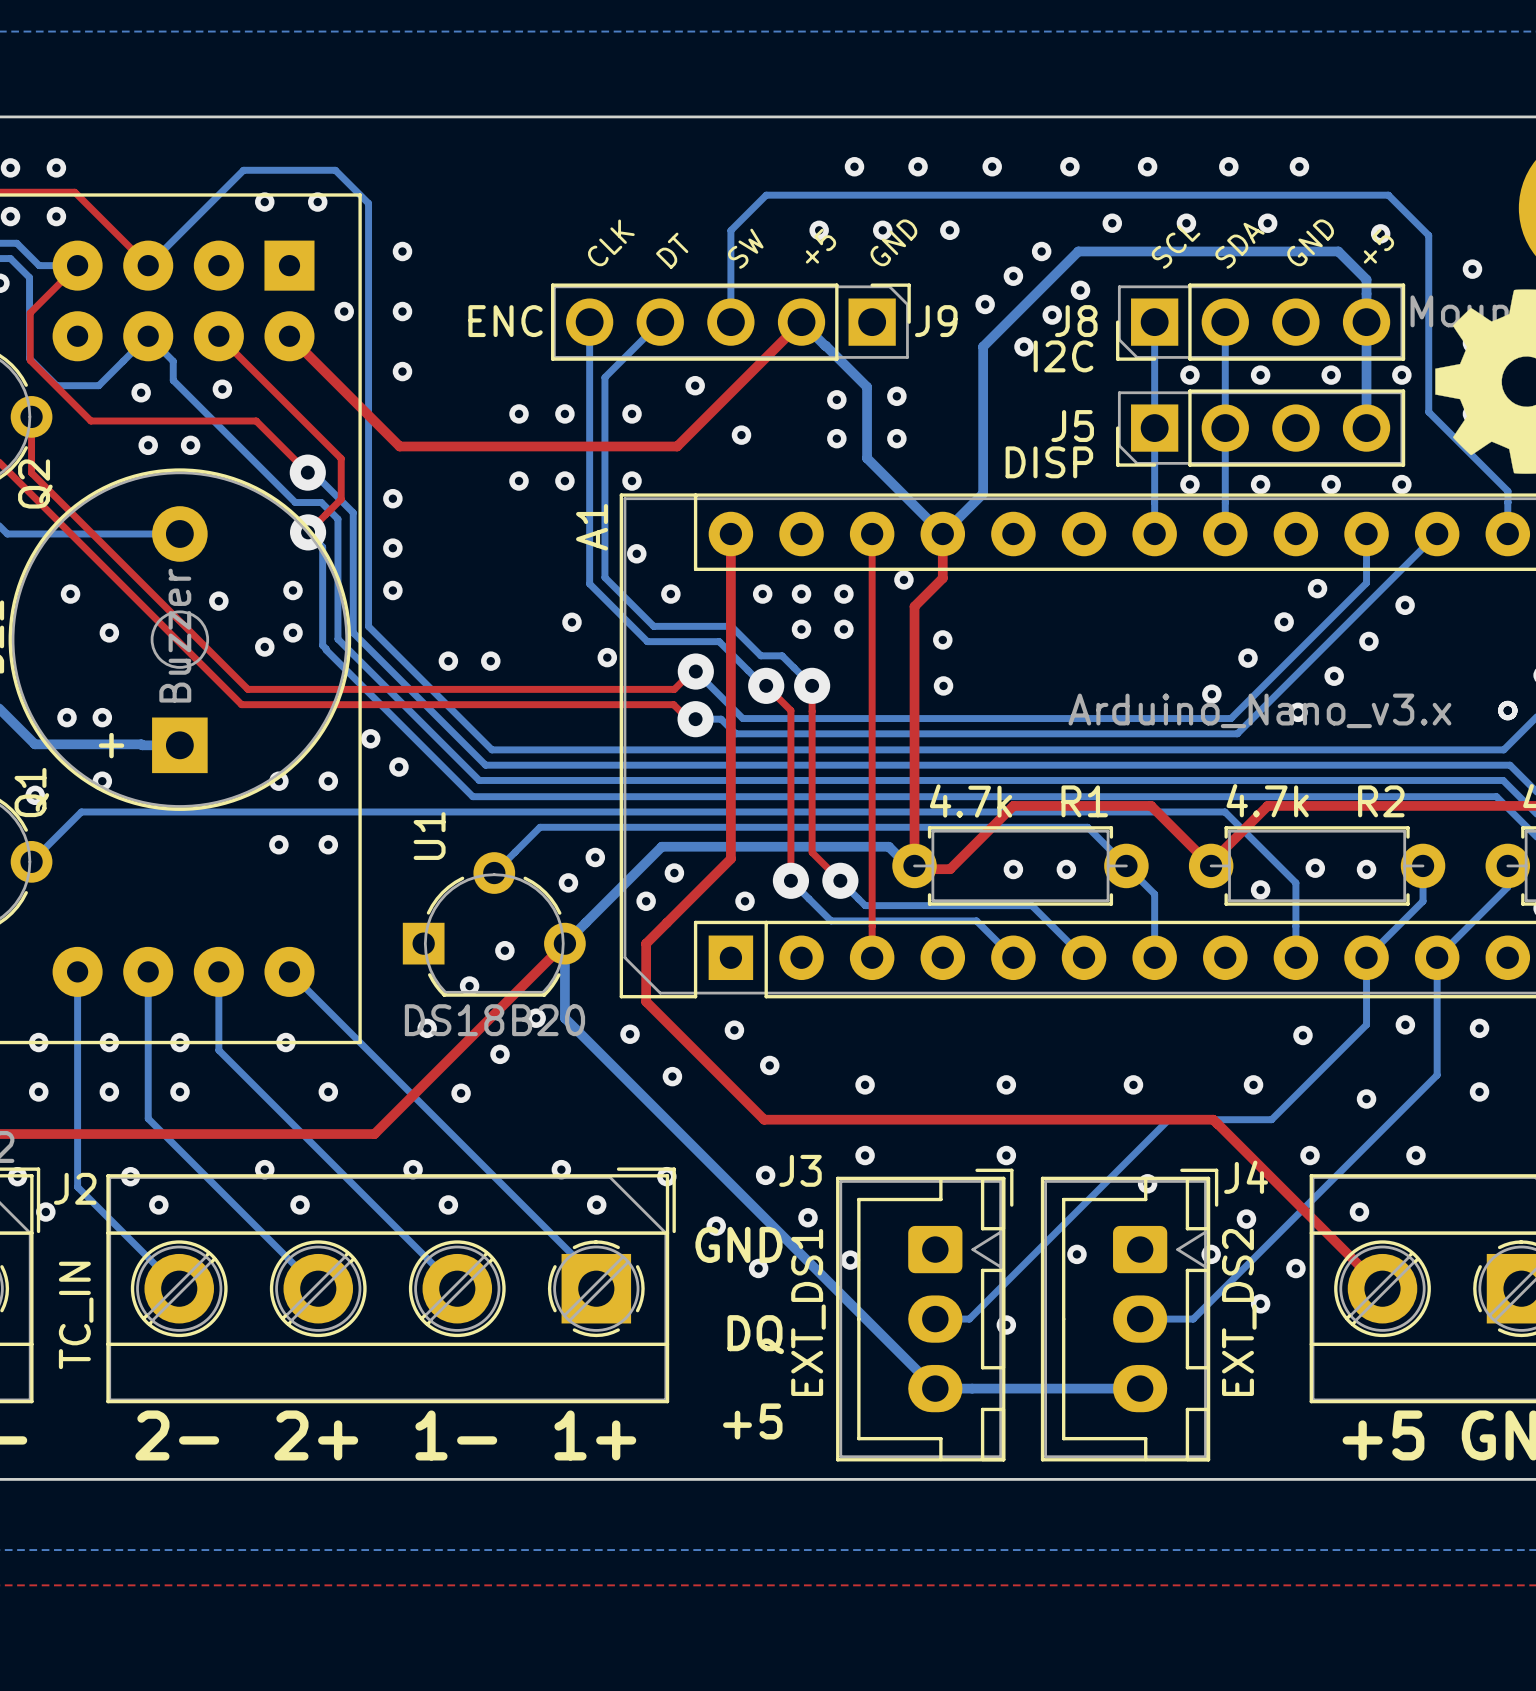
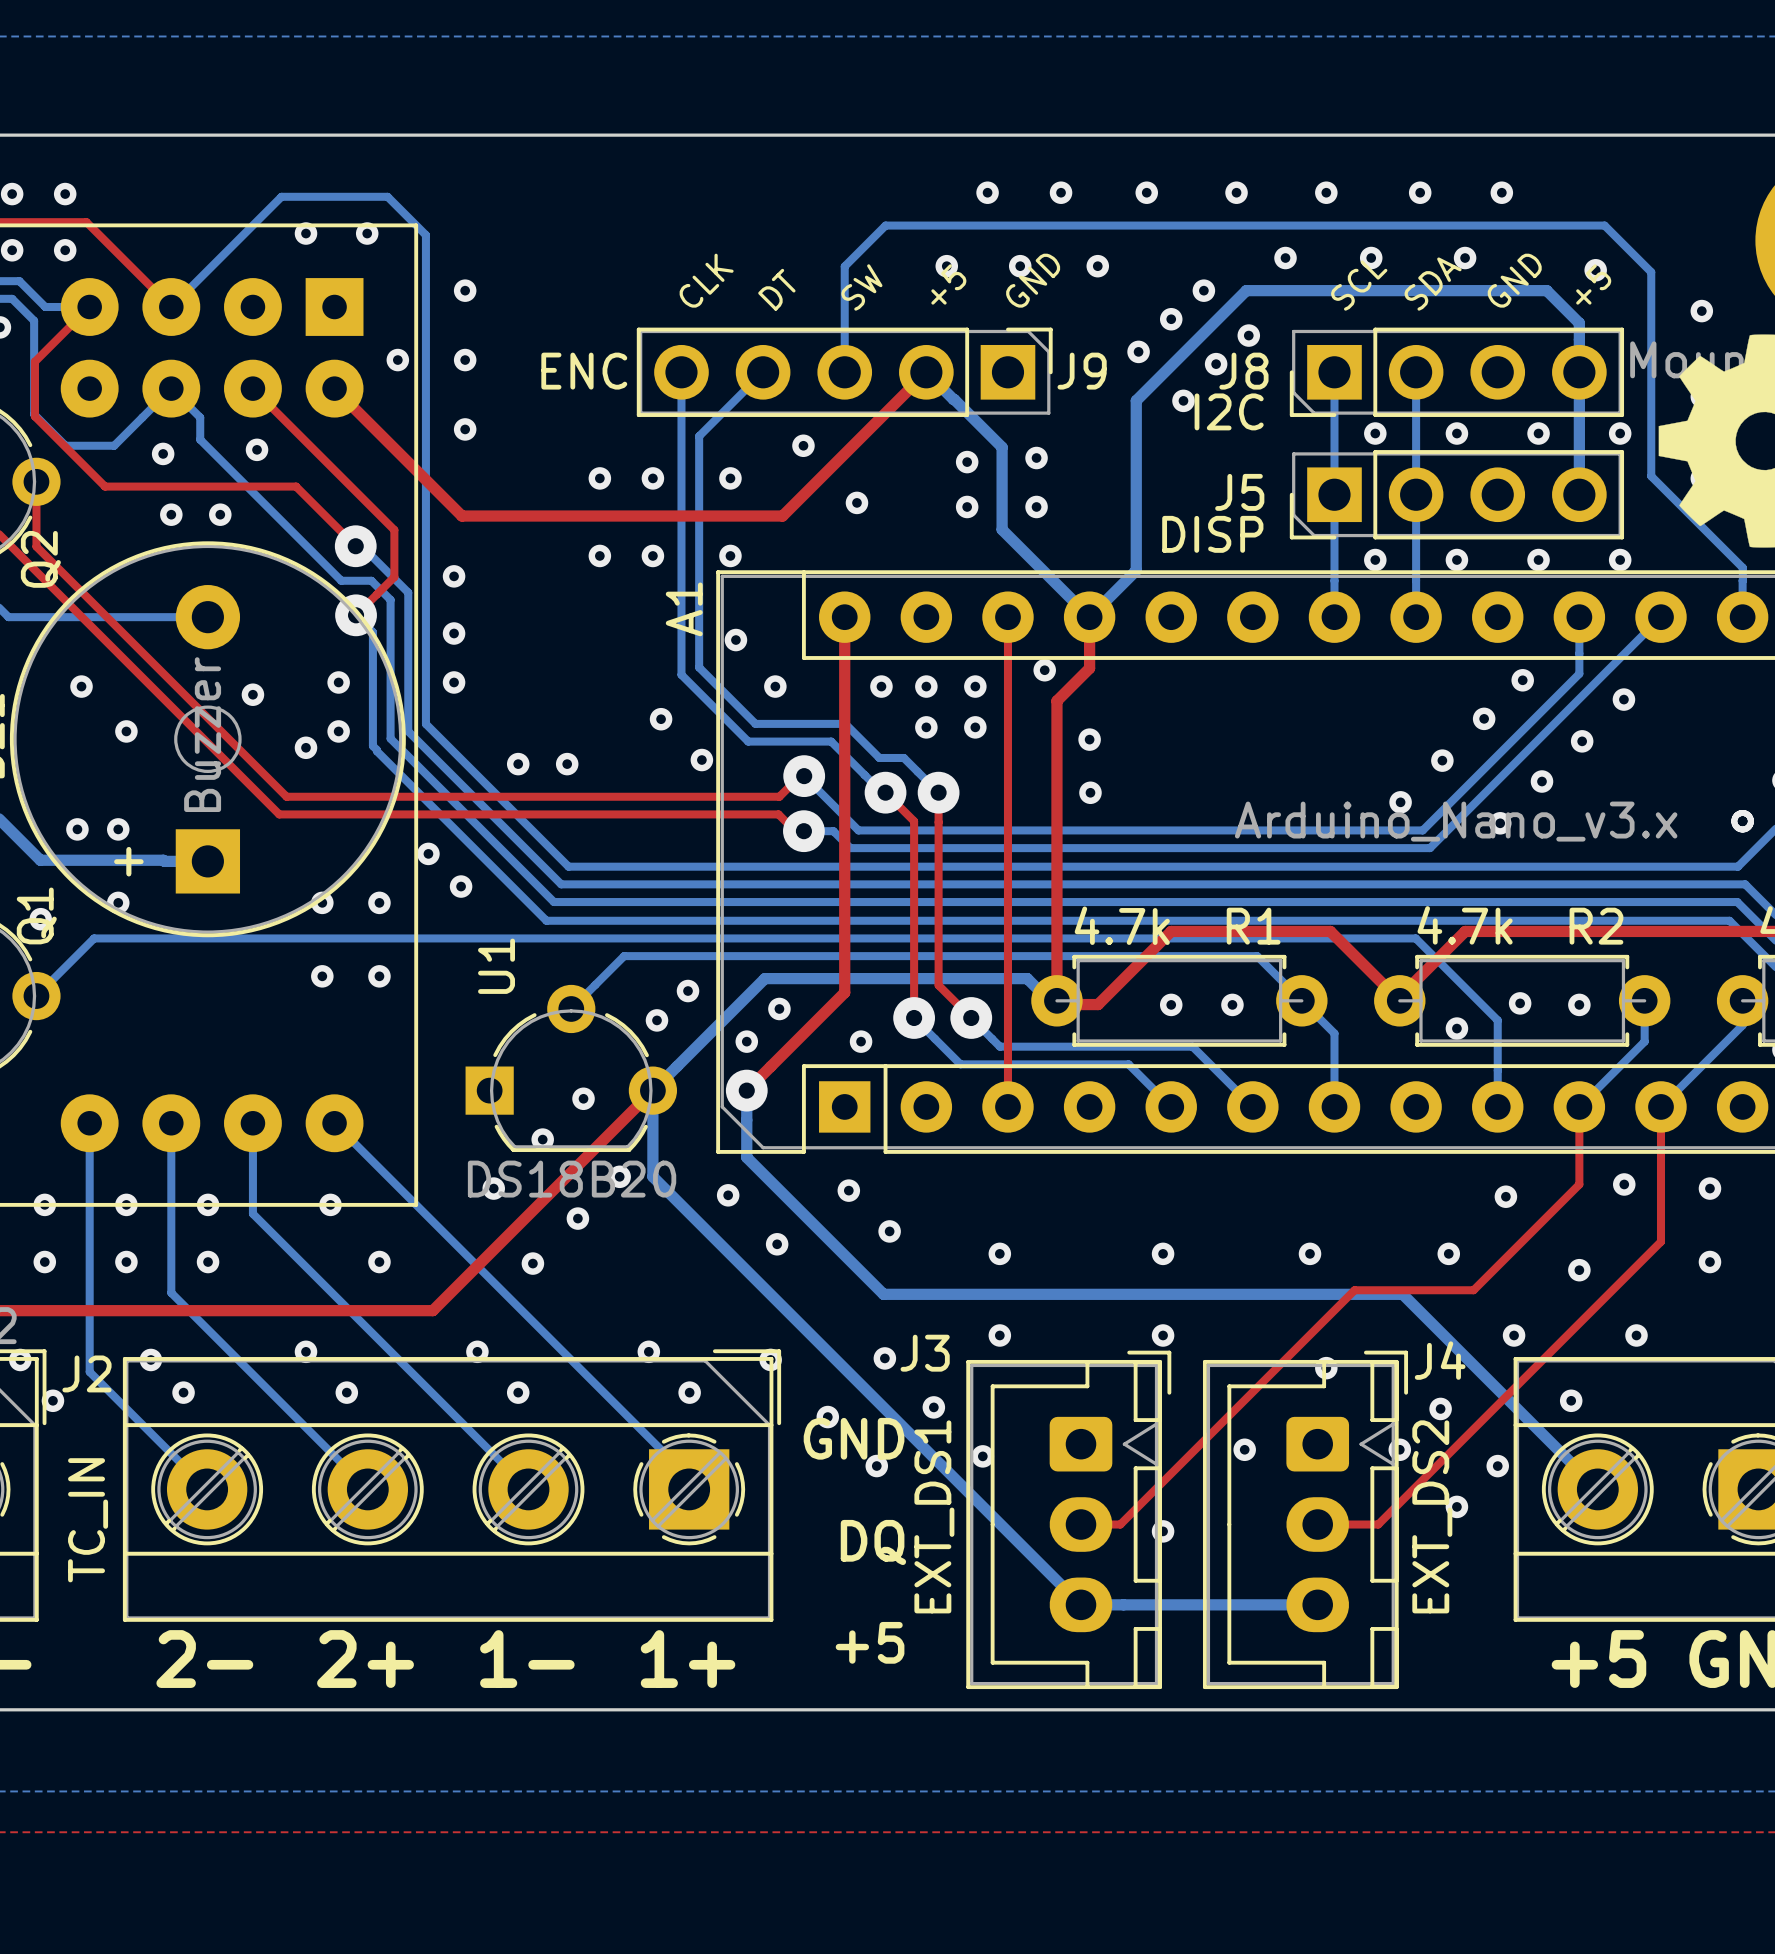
bottom track: none -> (746, 1090) (746, 1157) (883, 1294) (1402, 1294) (1597, 1489)
top track: (646, 943) (646, 1001) (764, 1119) (1213, 1119) (1382, 1288) -> none
via: none -> (746, 1090)
bottom track: (1366, 957) (1366, 1024) (1271, 1119) (1168, 1119) (969, 1319) (935, 1319) -> none
top track: none -> (1579, 1106) (1579, 1184) (1473, 1290) (1354, 1290) (1120, 1524) (1080, 1524)
bottom track: (1437, 957) (1437, 1075) (1193, 1319) (1140, 1319) -> none
top track: none -> (1660, 1106) (1660, 1241) (1378, 1524) (1317, 1524)

